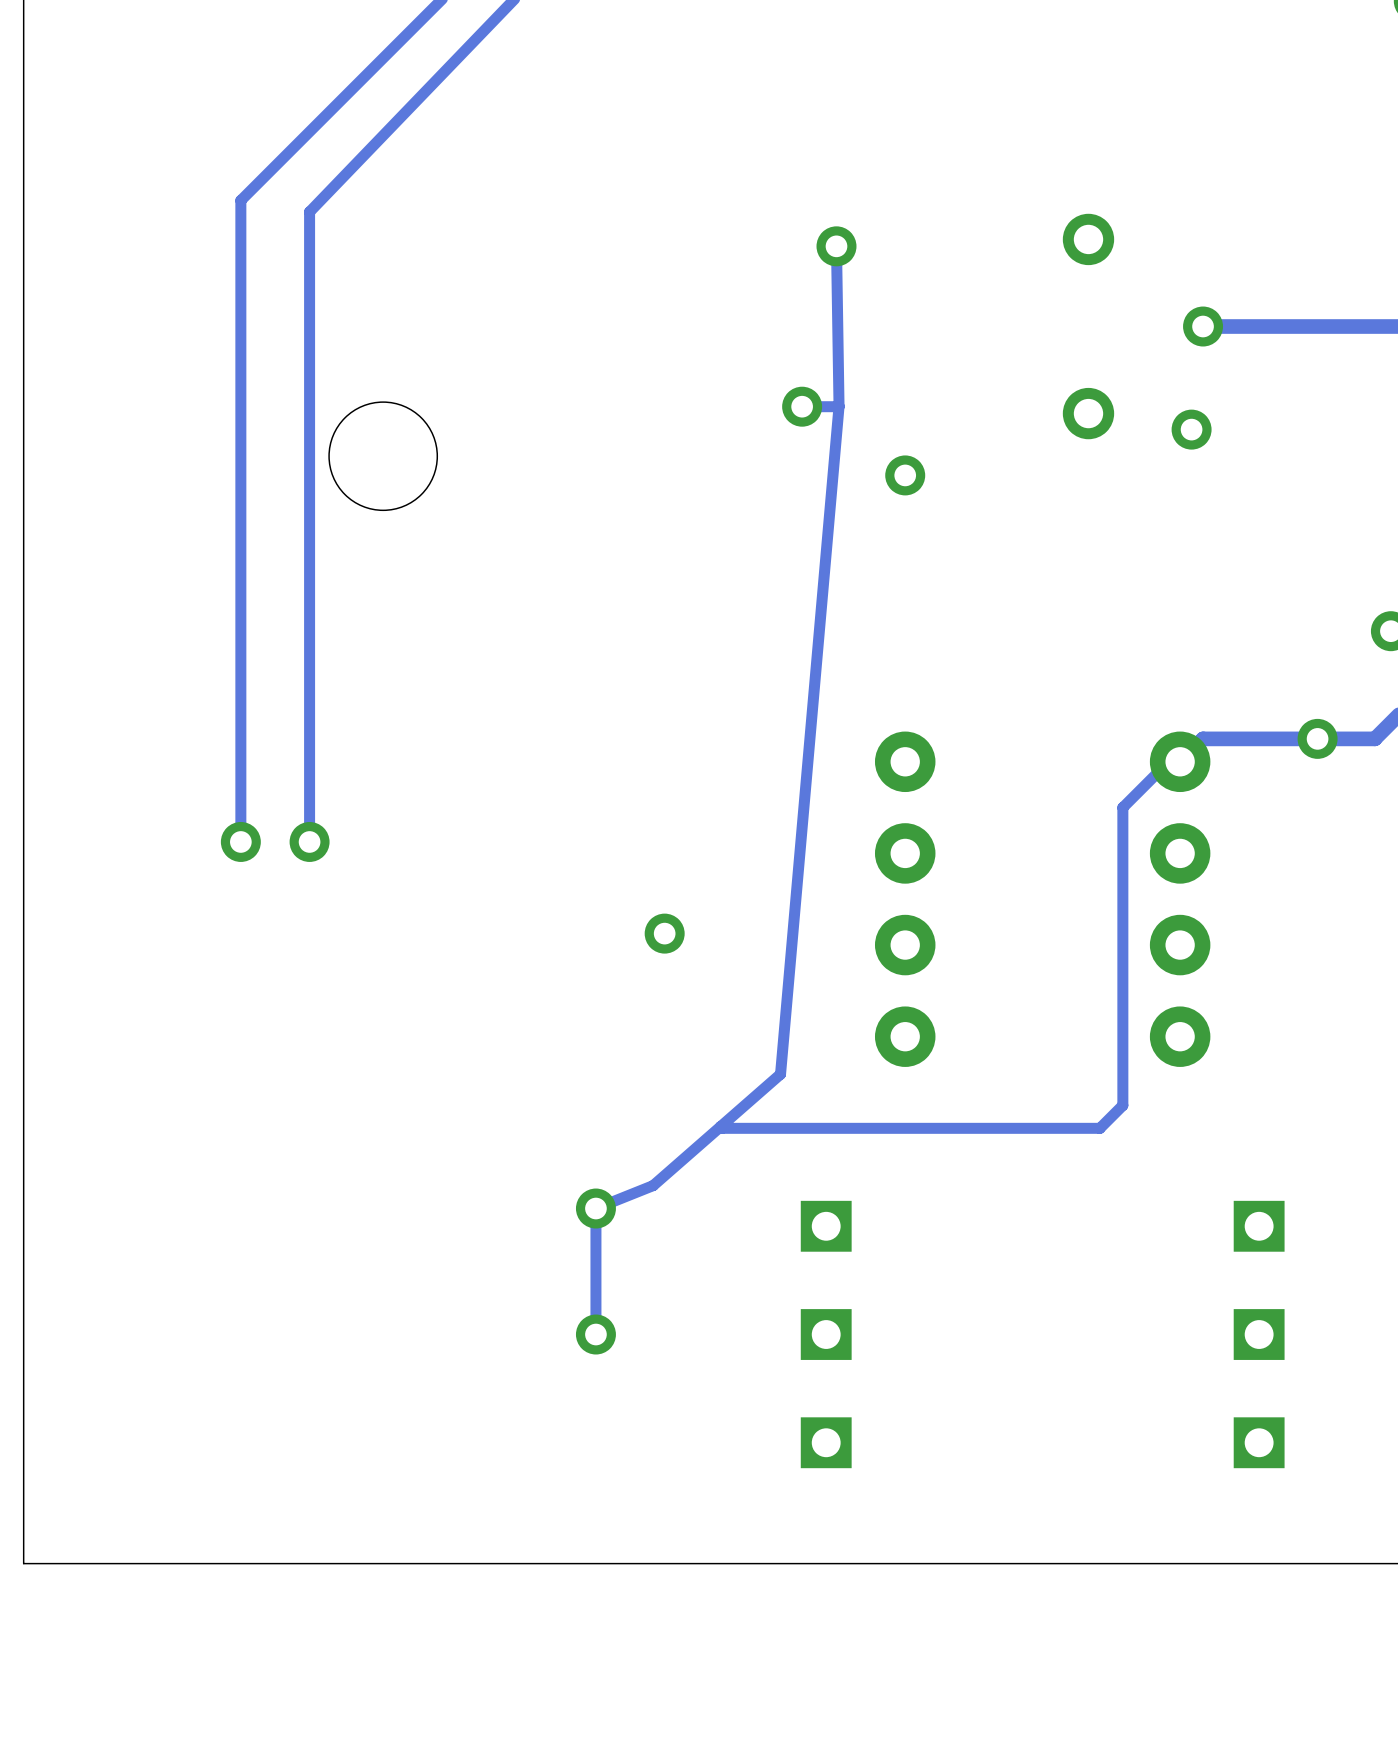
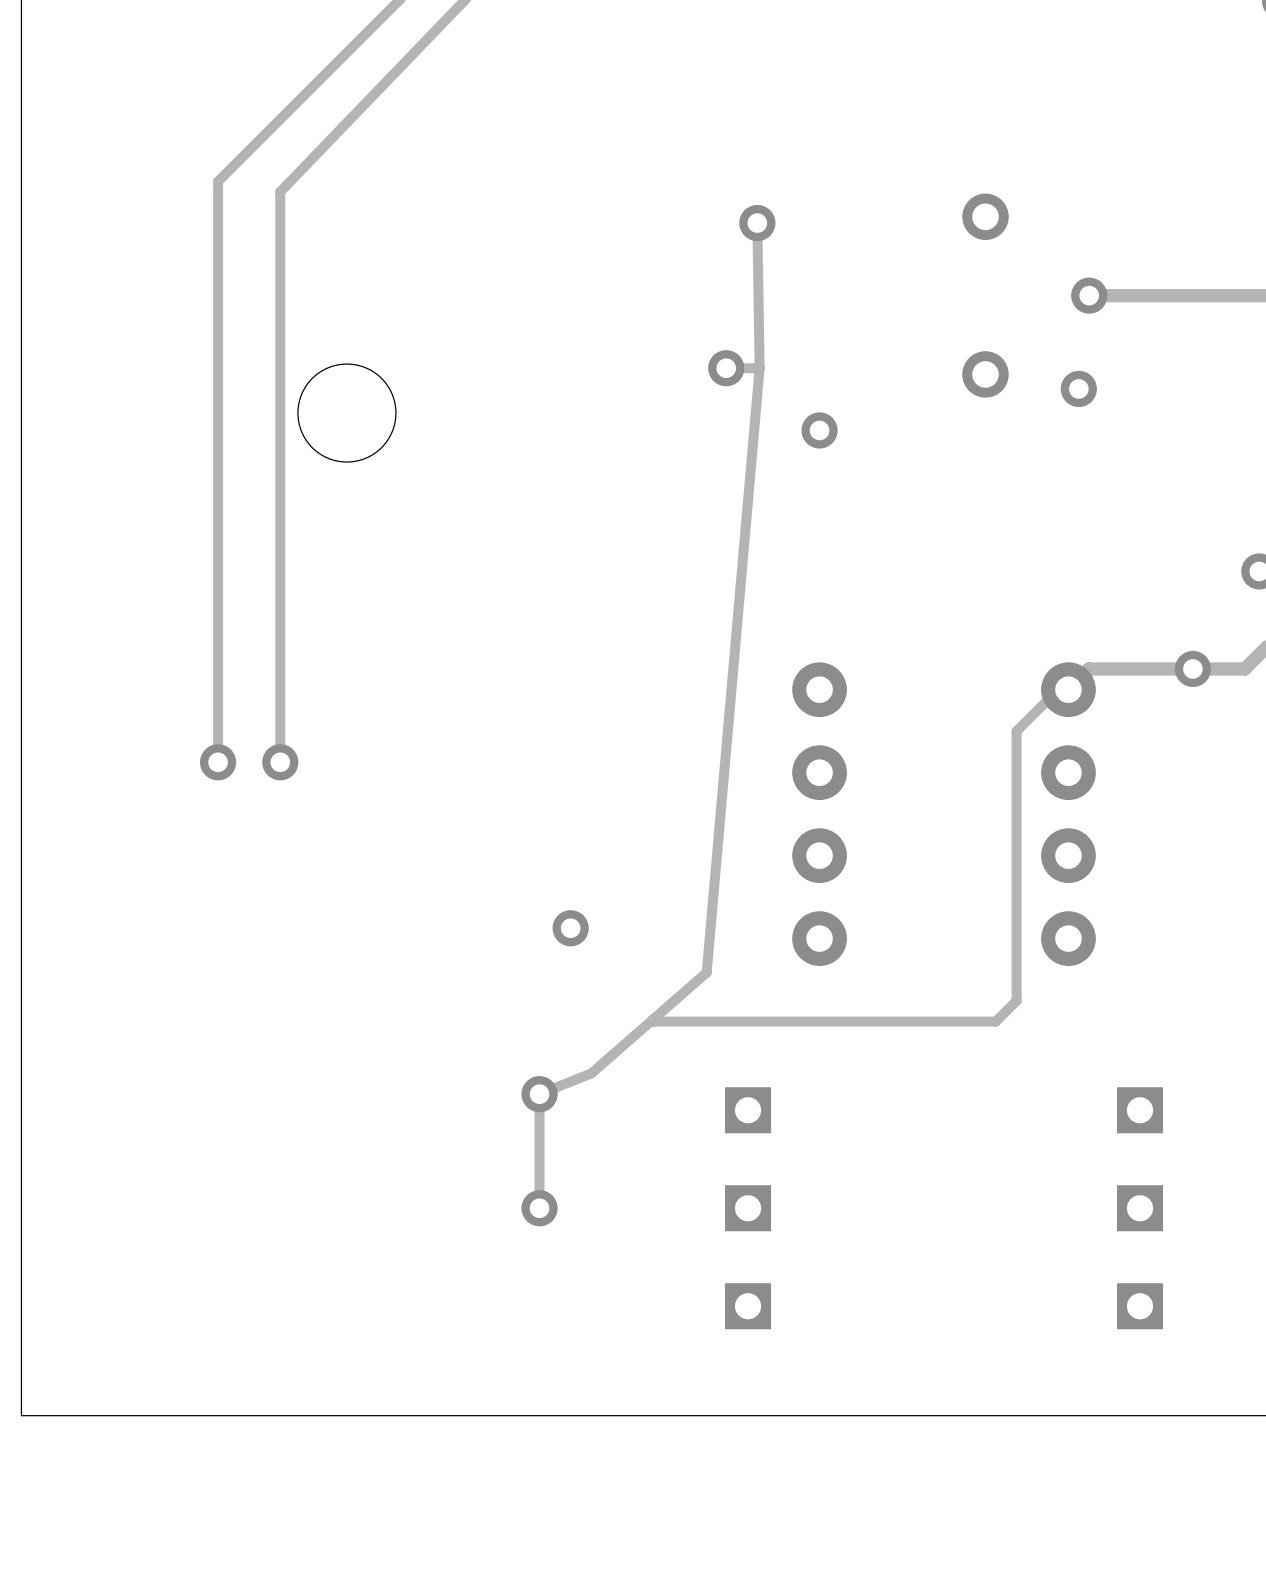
via position: (664, 933) -> (570, 928)

